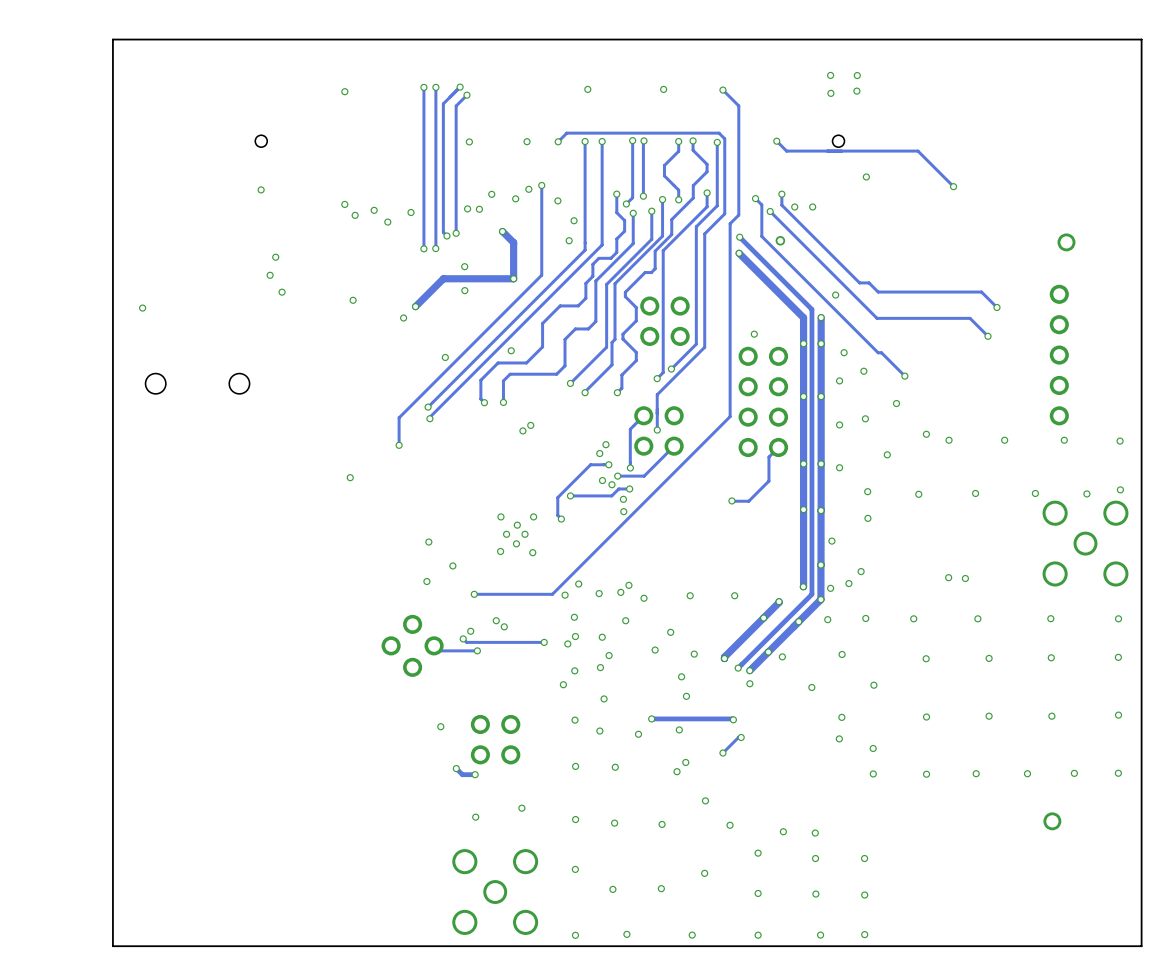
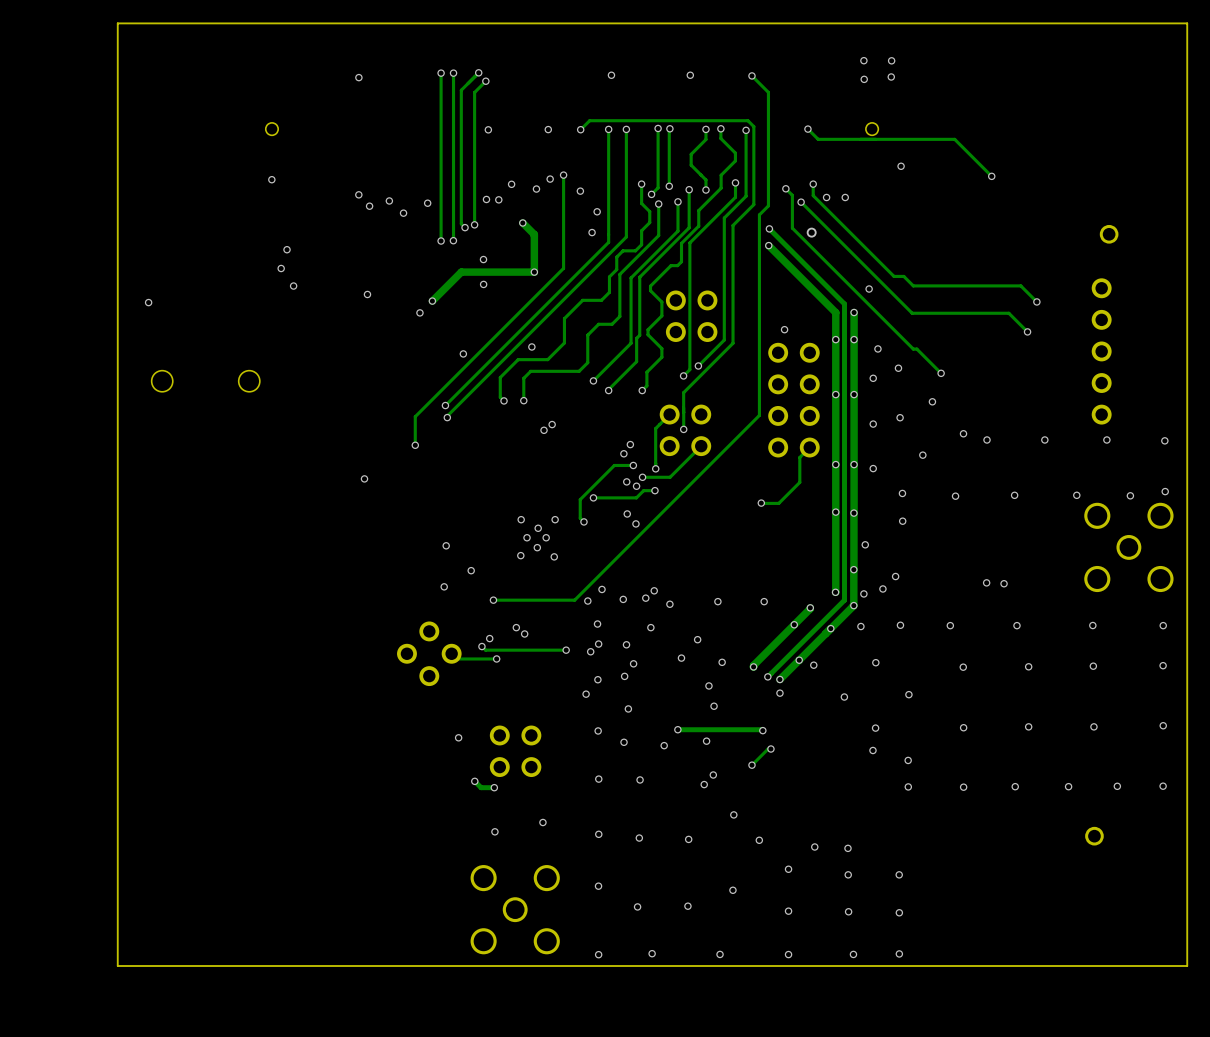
via: (623, 499) -> none
via: none -> (627, 513)
via: (623, 511) -> none
via: none -> (635, 523)

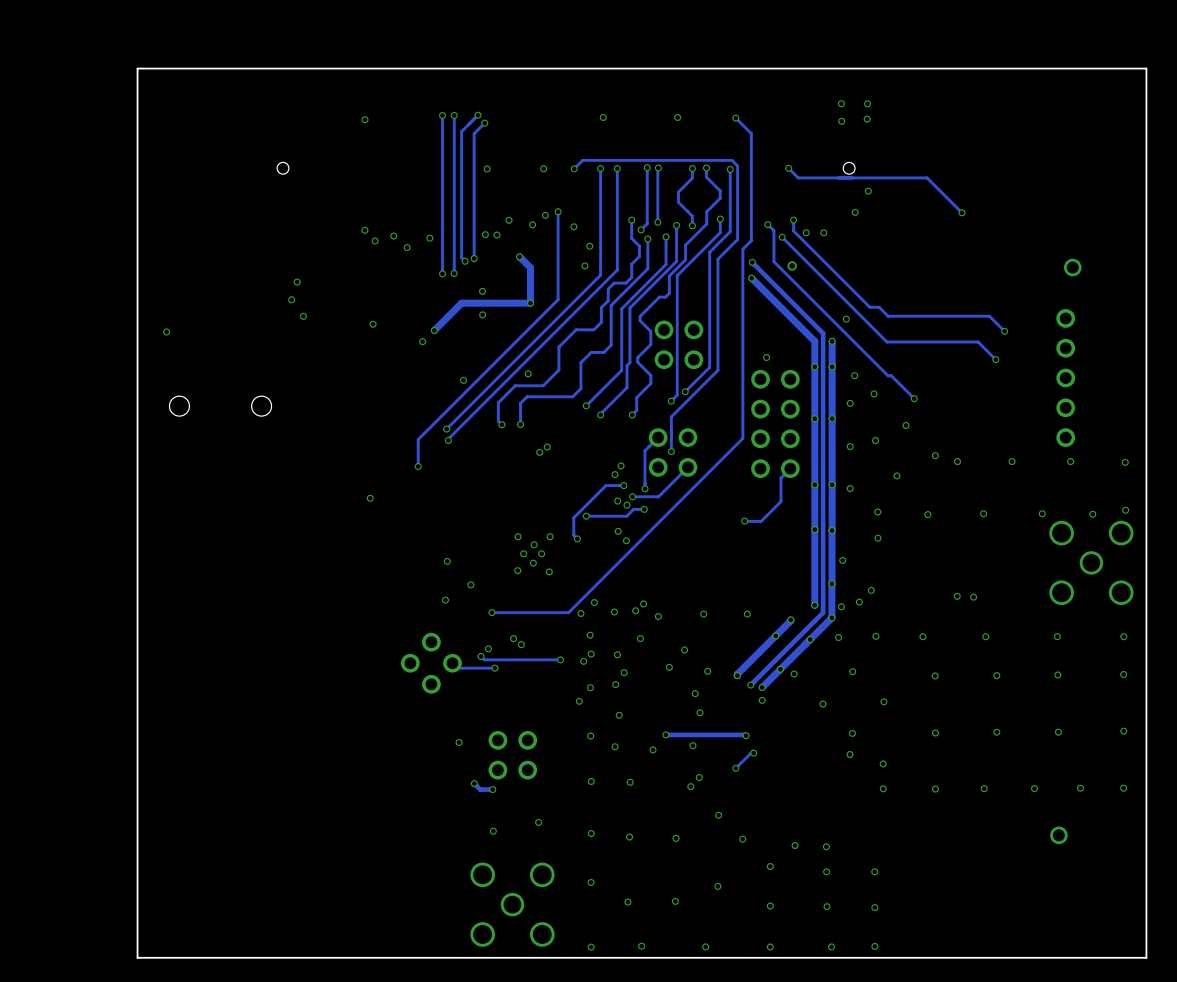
via: none -> (868, 191)
via: (901, 166) -> none
via: none -> (855, 212)
via: (271, 179) -> none

